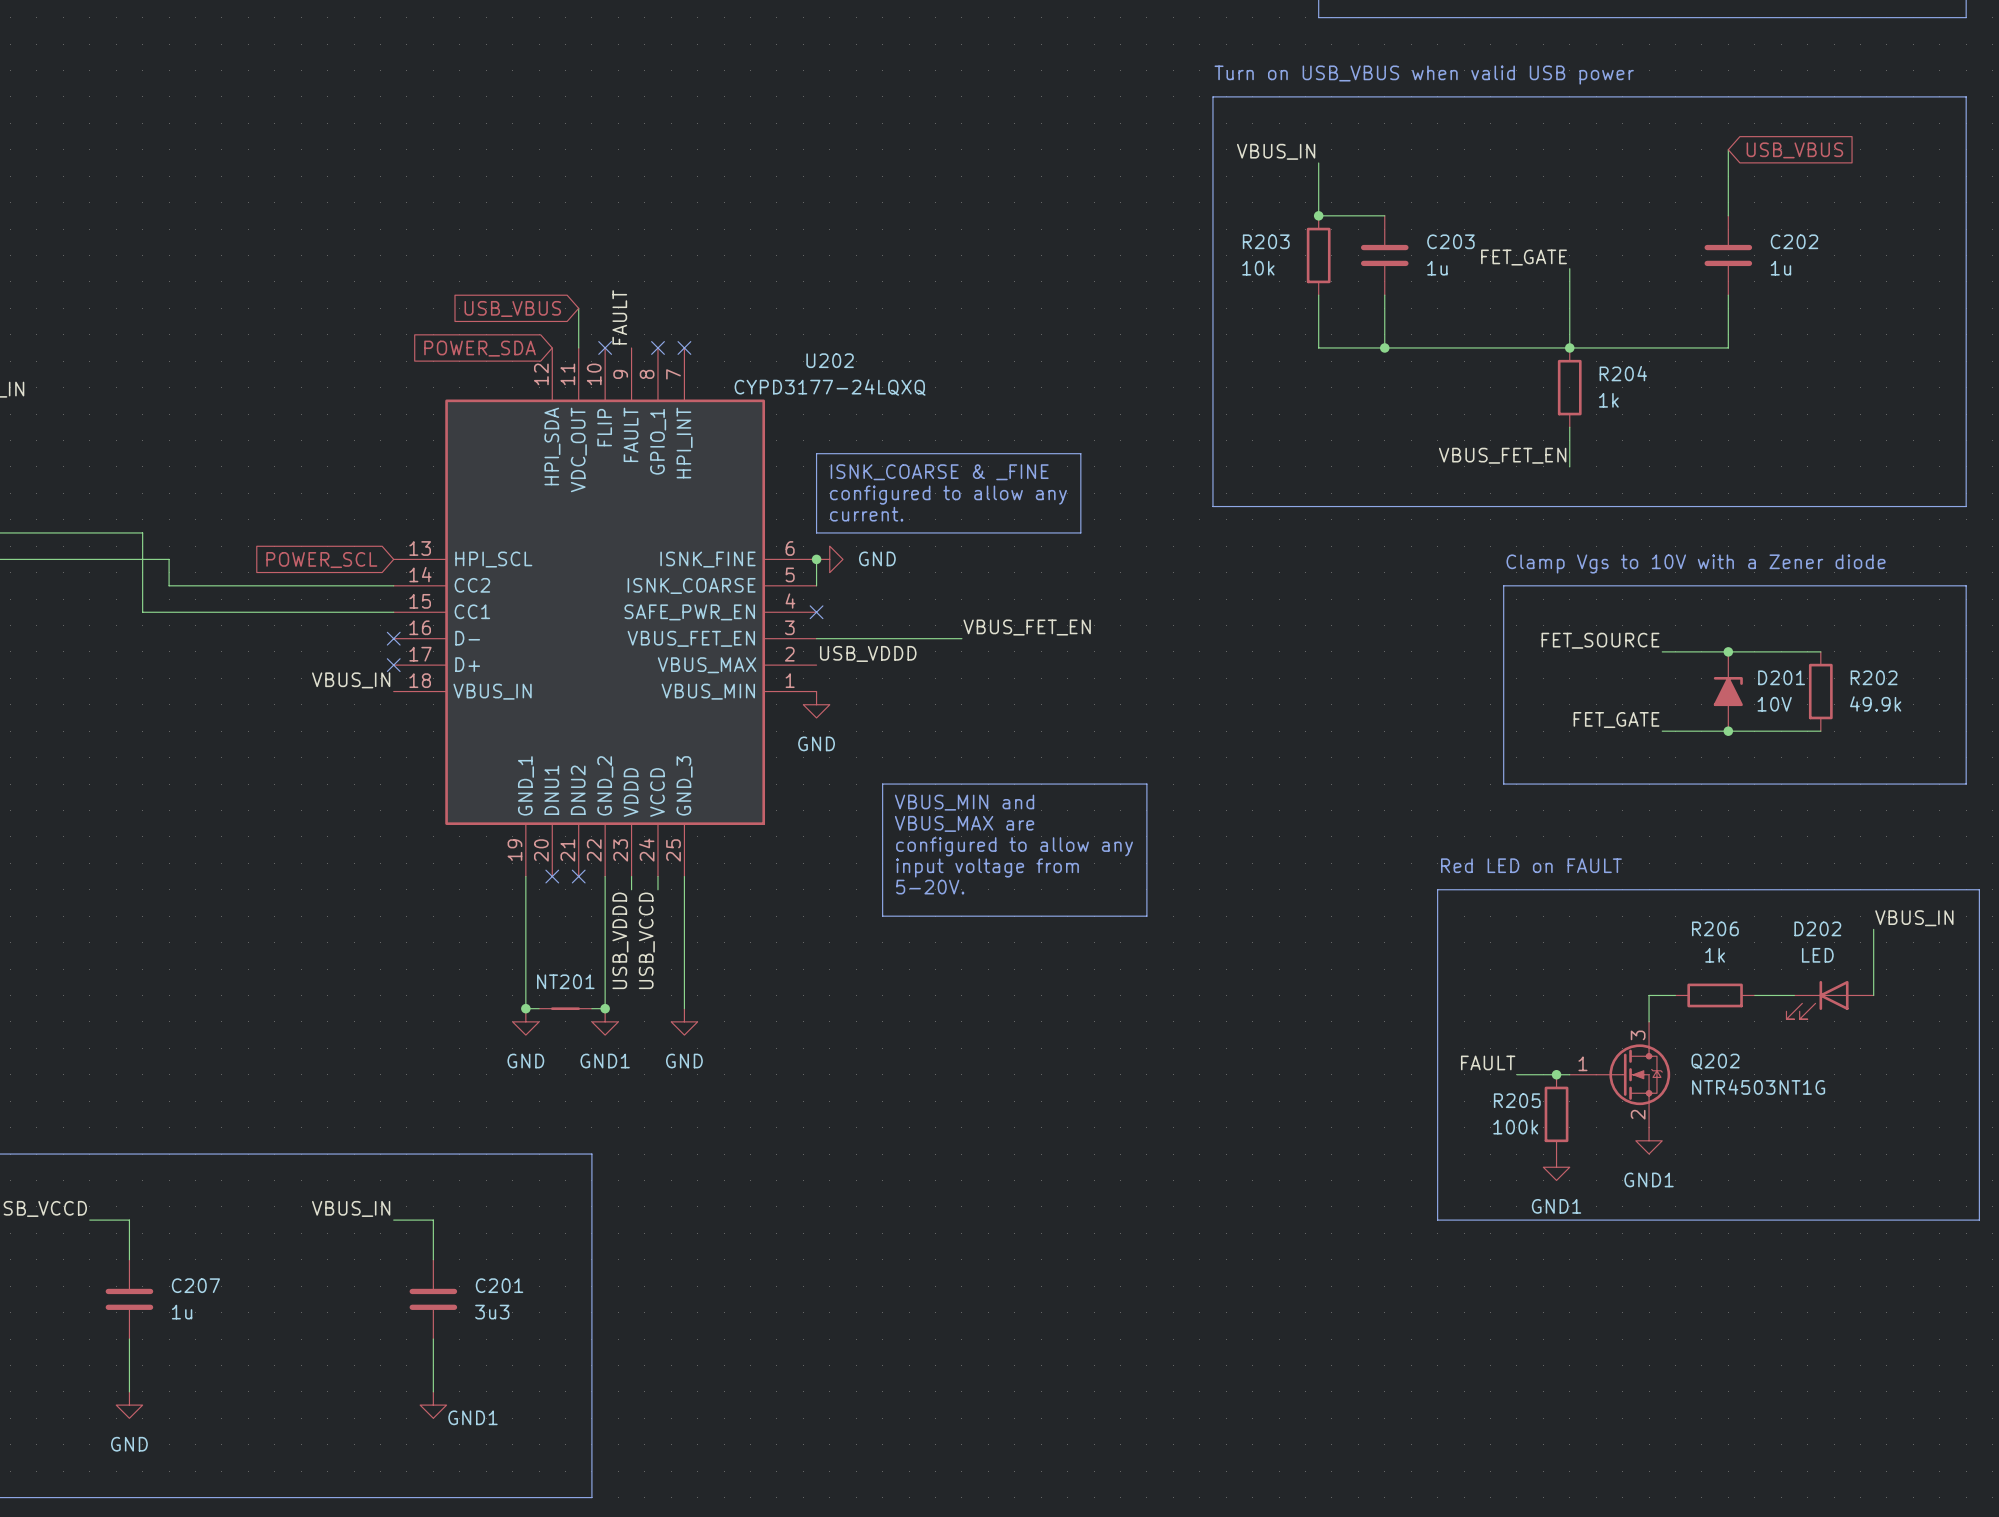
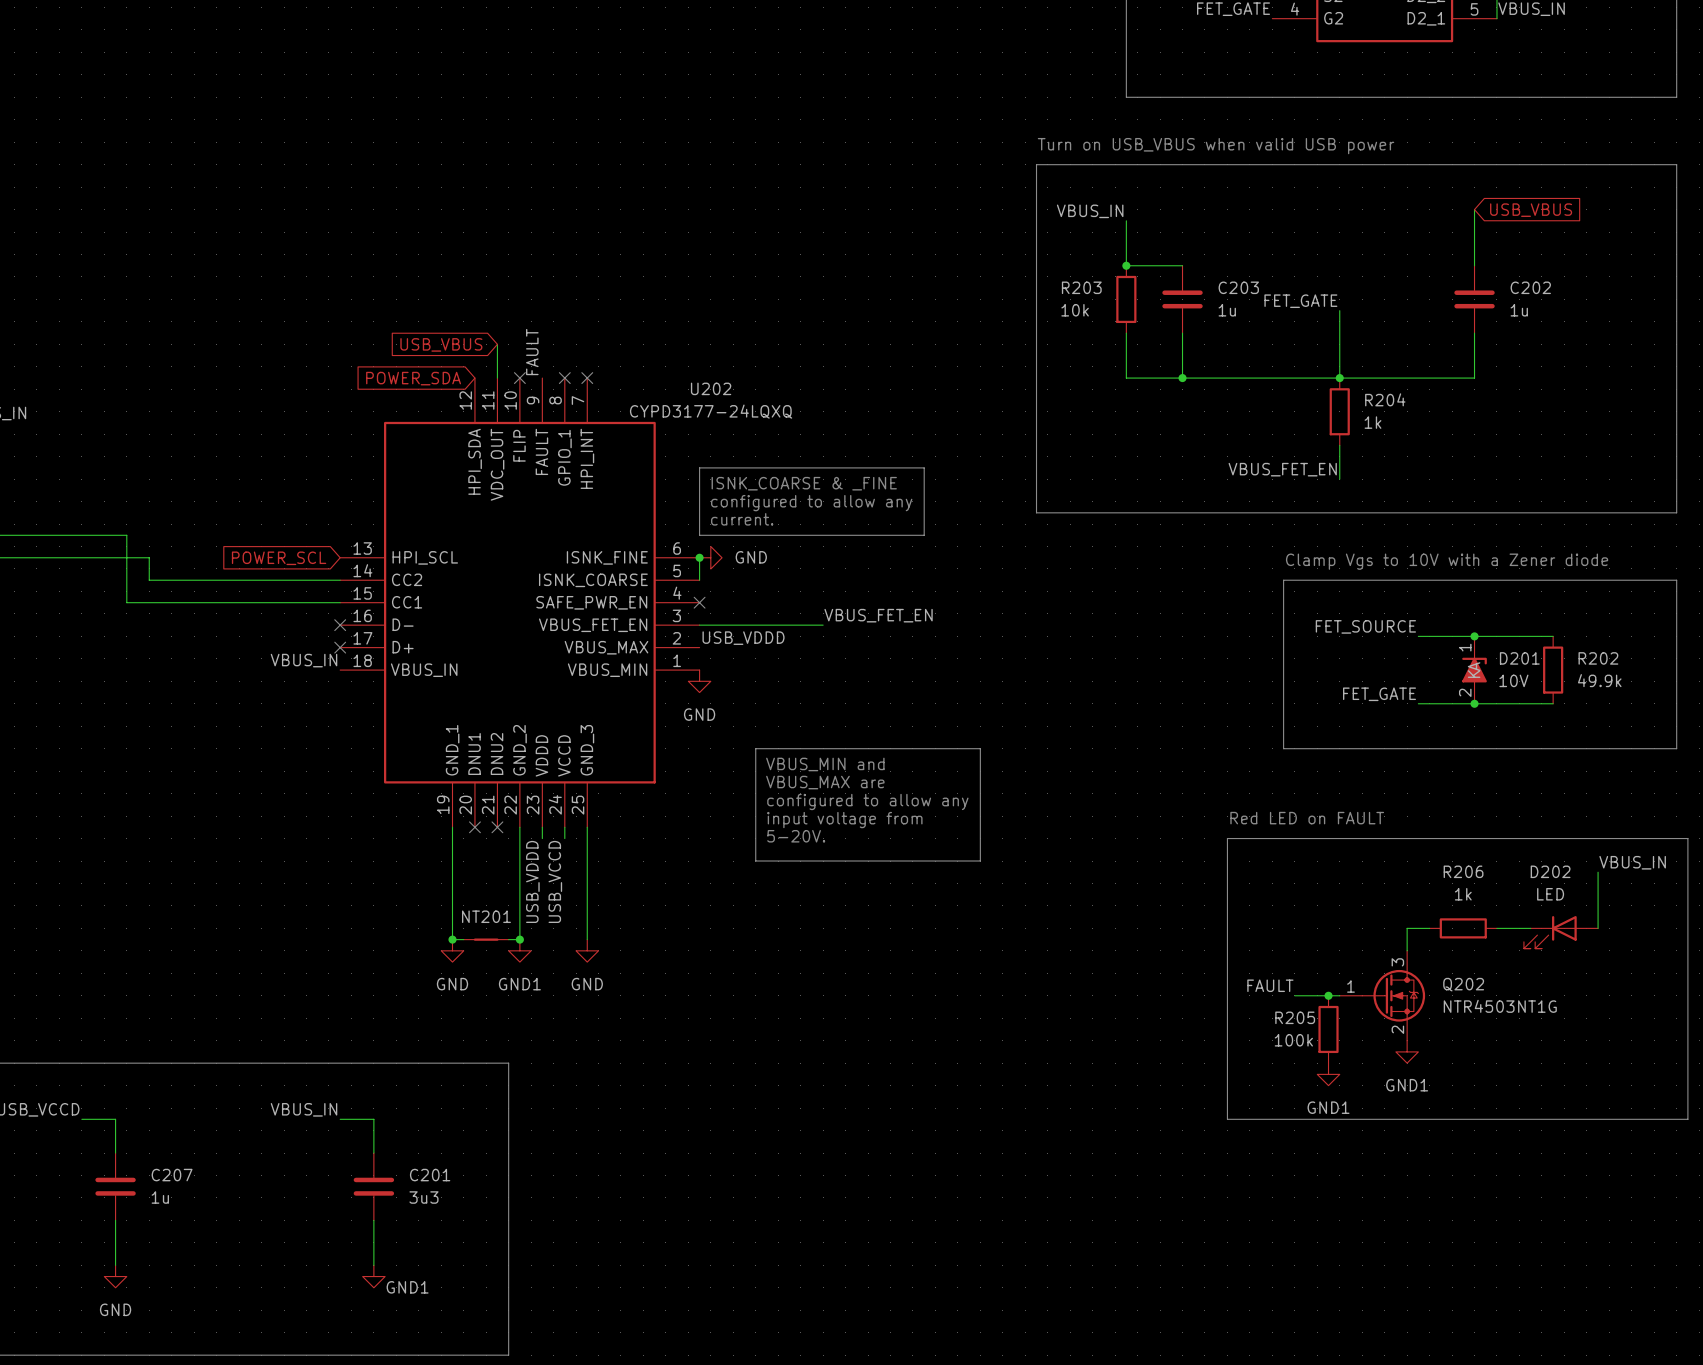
D201 pin number: none -> 1 (1465, 647)
D201 pin name: none -> A (1474, 666)
D201 pin name: none -> K (1474, 674)
D201 pin number: none -> 2 (1465, 692)

